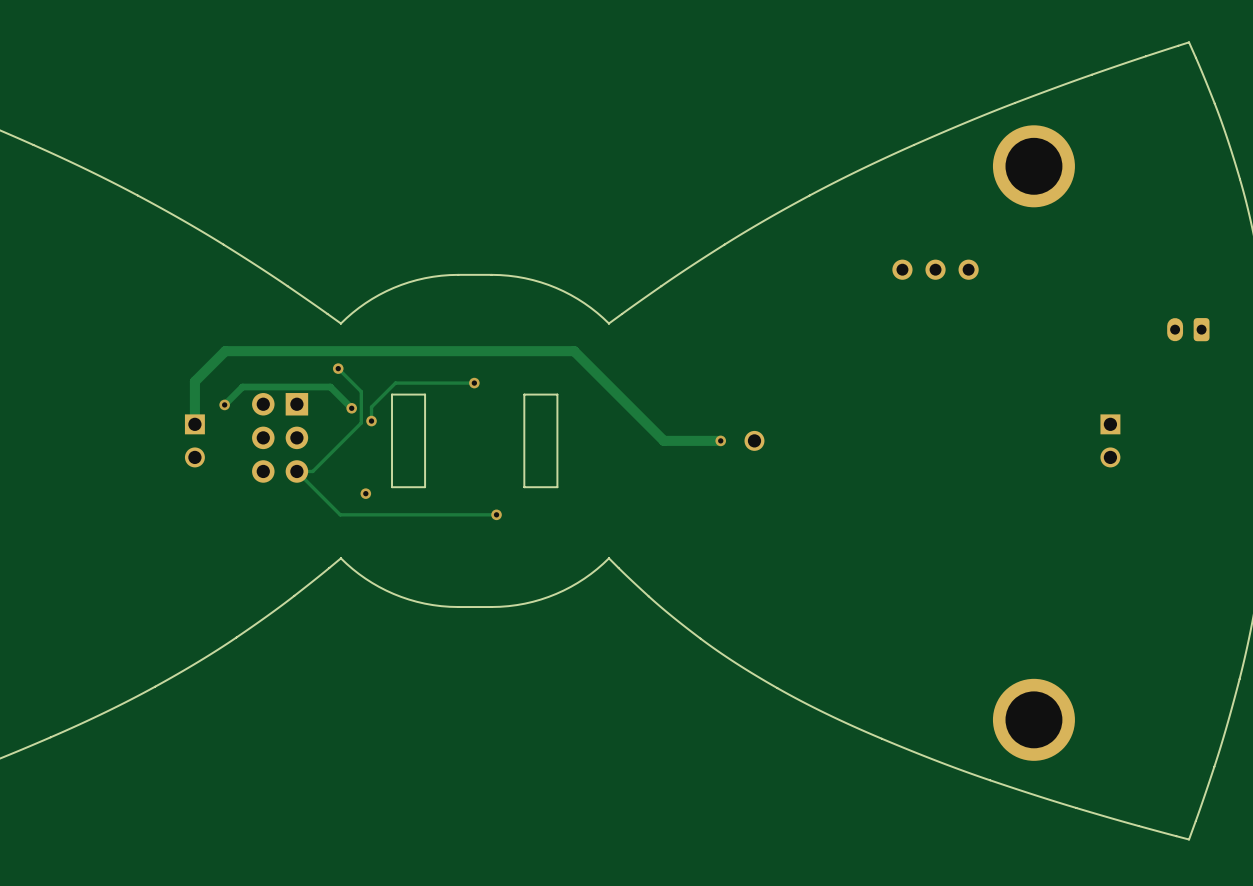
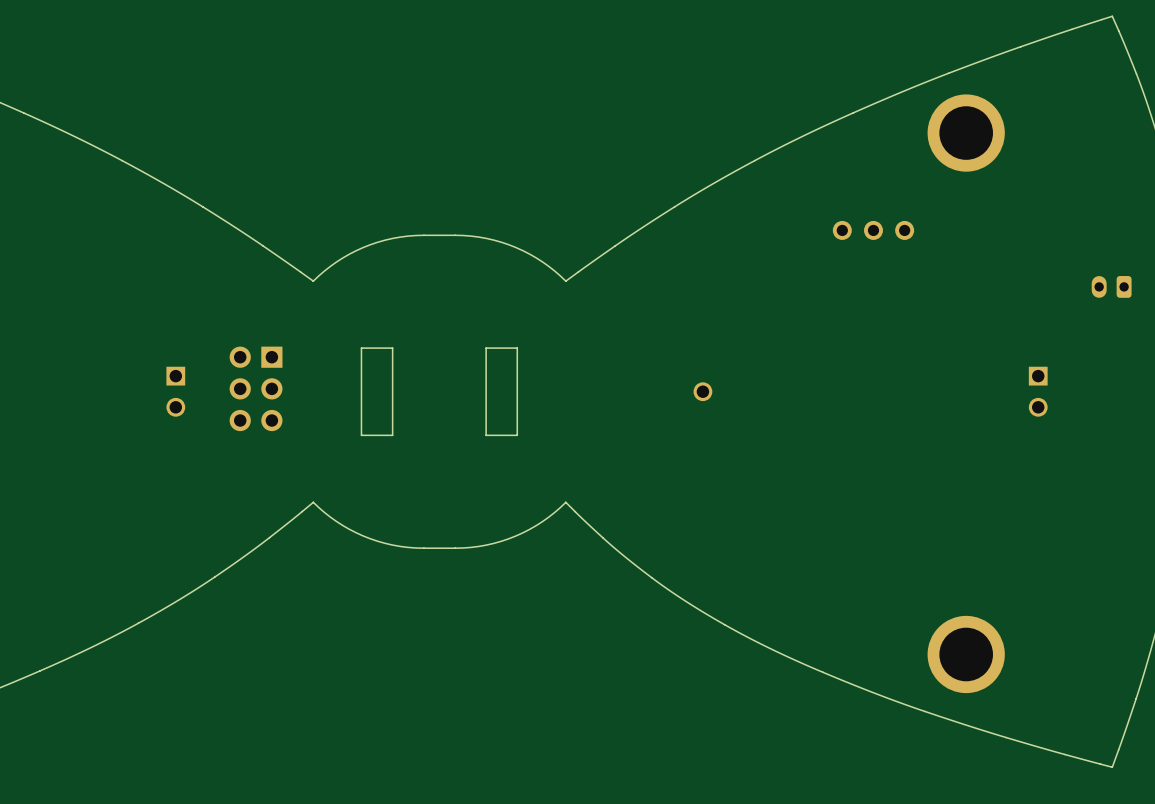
track: (338, 368) (361, 391) (361, 422) (312, 471) (296, 471) (340, 514) (496, 514) -> none
via: (338, 368) -> none
track: (474, 383) (395, 383) (371, 407) (371, 421) -> none
via: (474, 383) -> none
track: (224, 404) (242, 387) (330, 387) (351, 408) -> none
via: (224, 404) -> none
via: (351, 408) -> none
via: (371, 421) -> none
track: (194, 424) (194, 381) (225, 351) (574, 351) (663, 440) (720, 440) -> none
via: (720, 440) -> none
via: (365, 493) -> none
via: (496, 514) -> none

